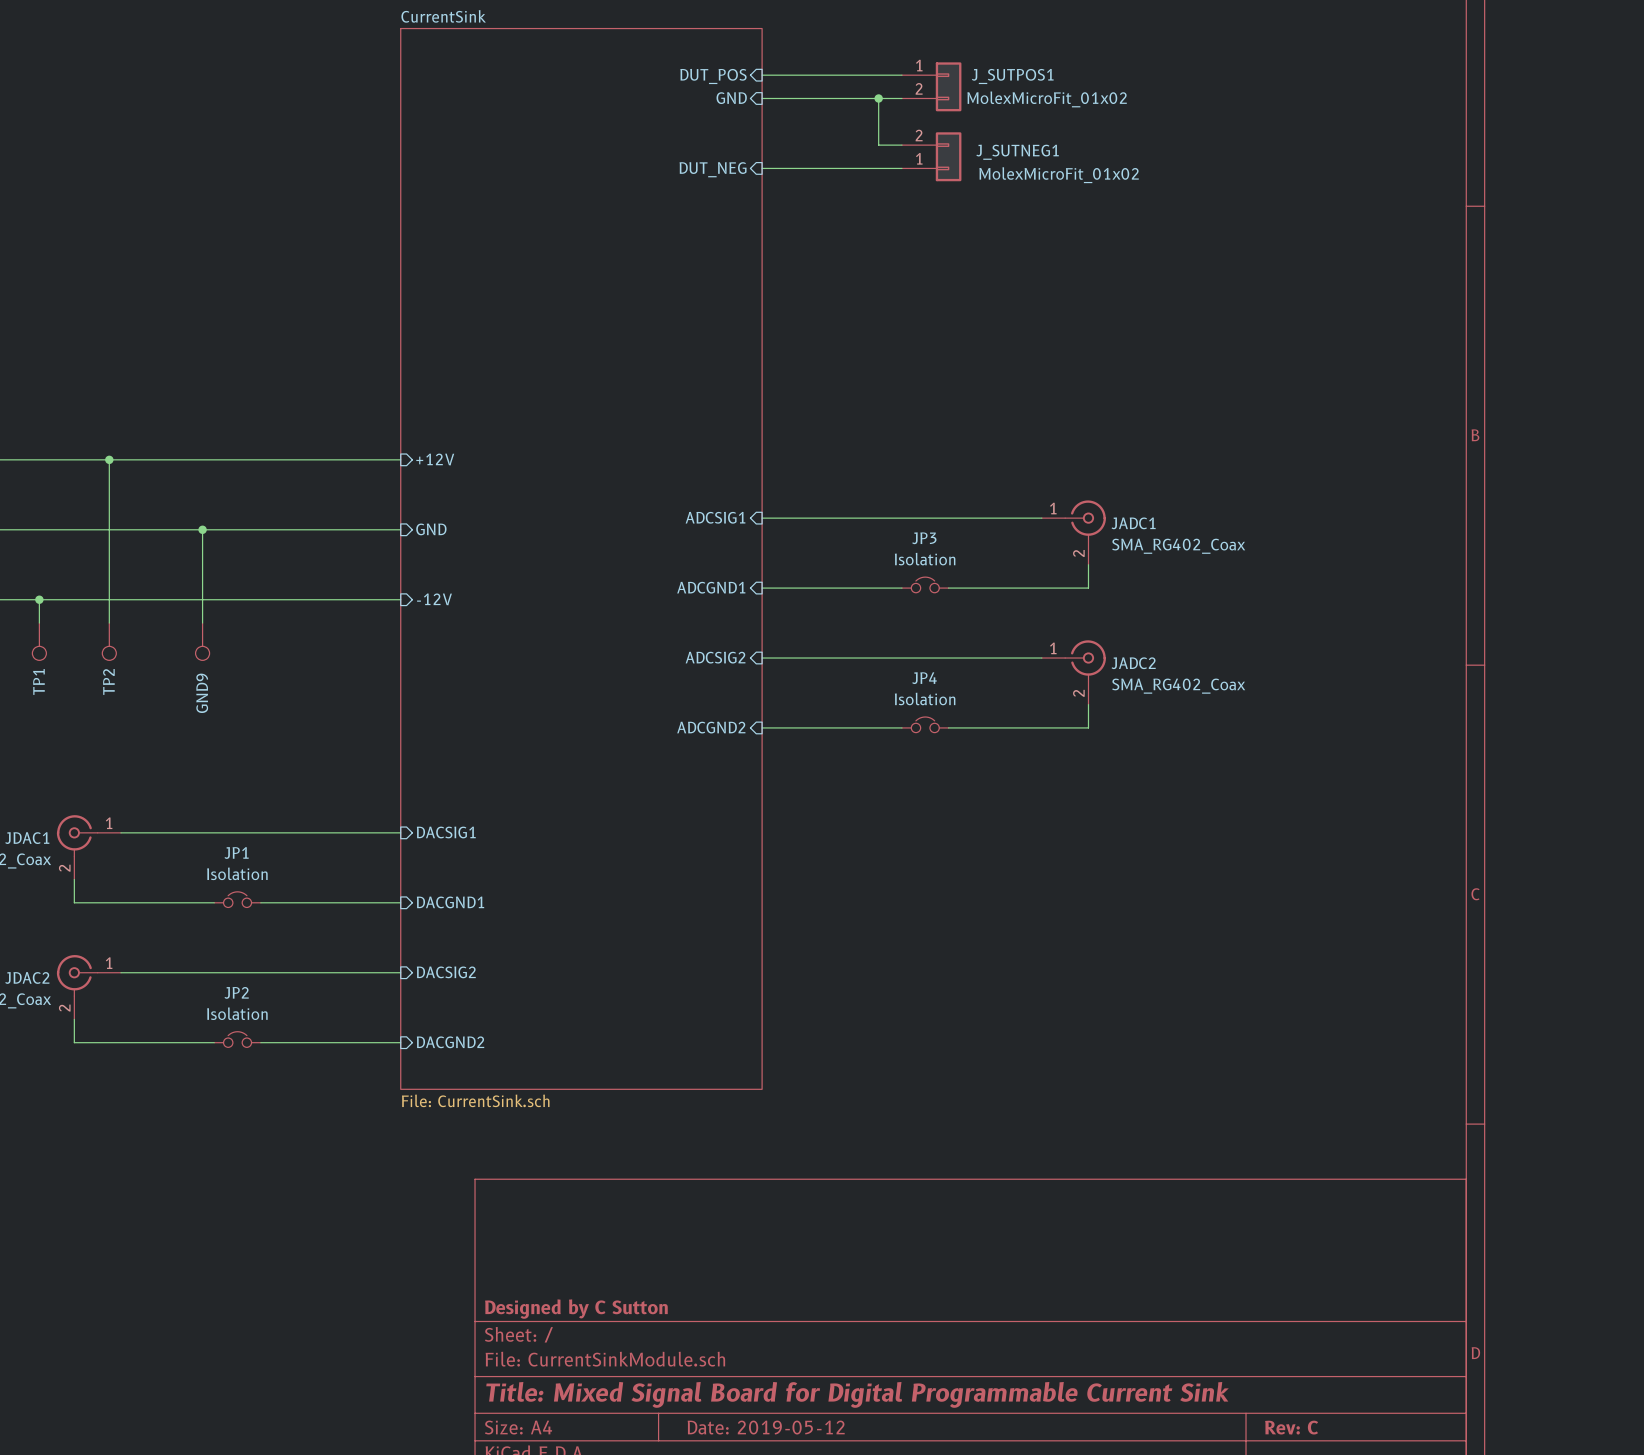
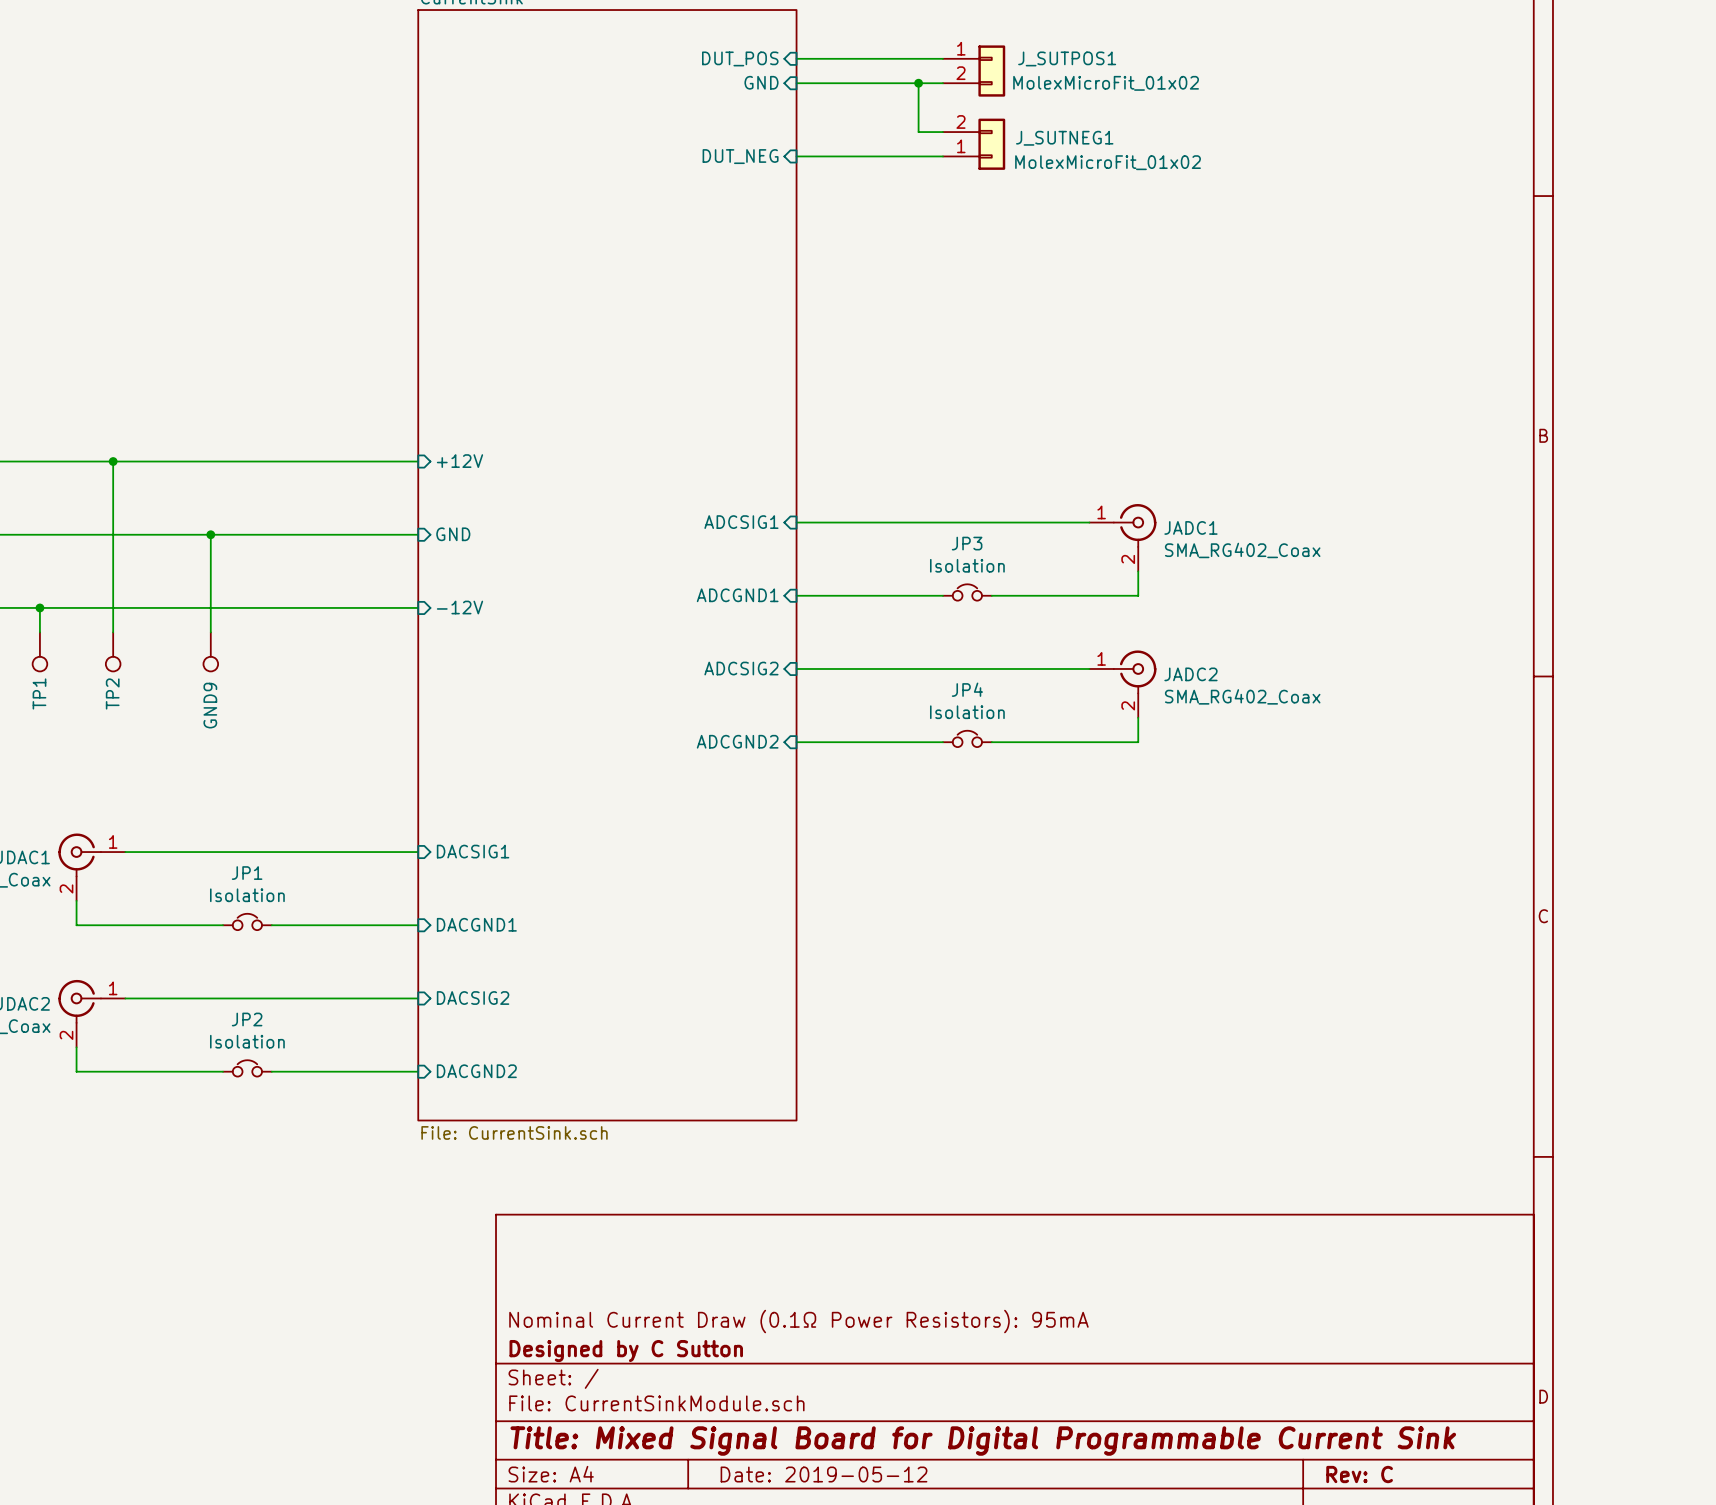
title block: none -> Nominal Current Draw (0.1Ω Power Resistors): 95mA (798, 1321)

